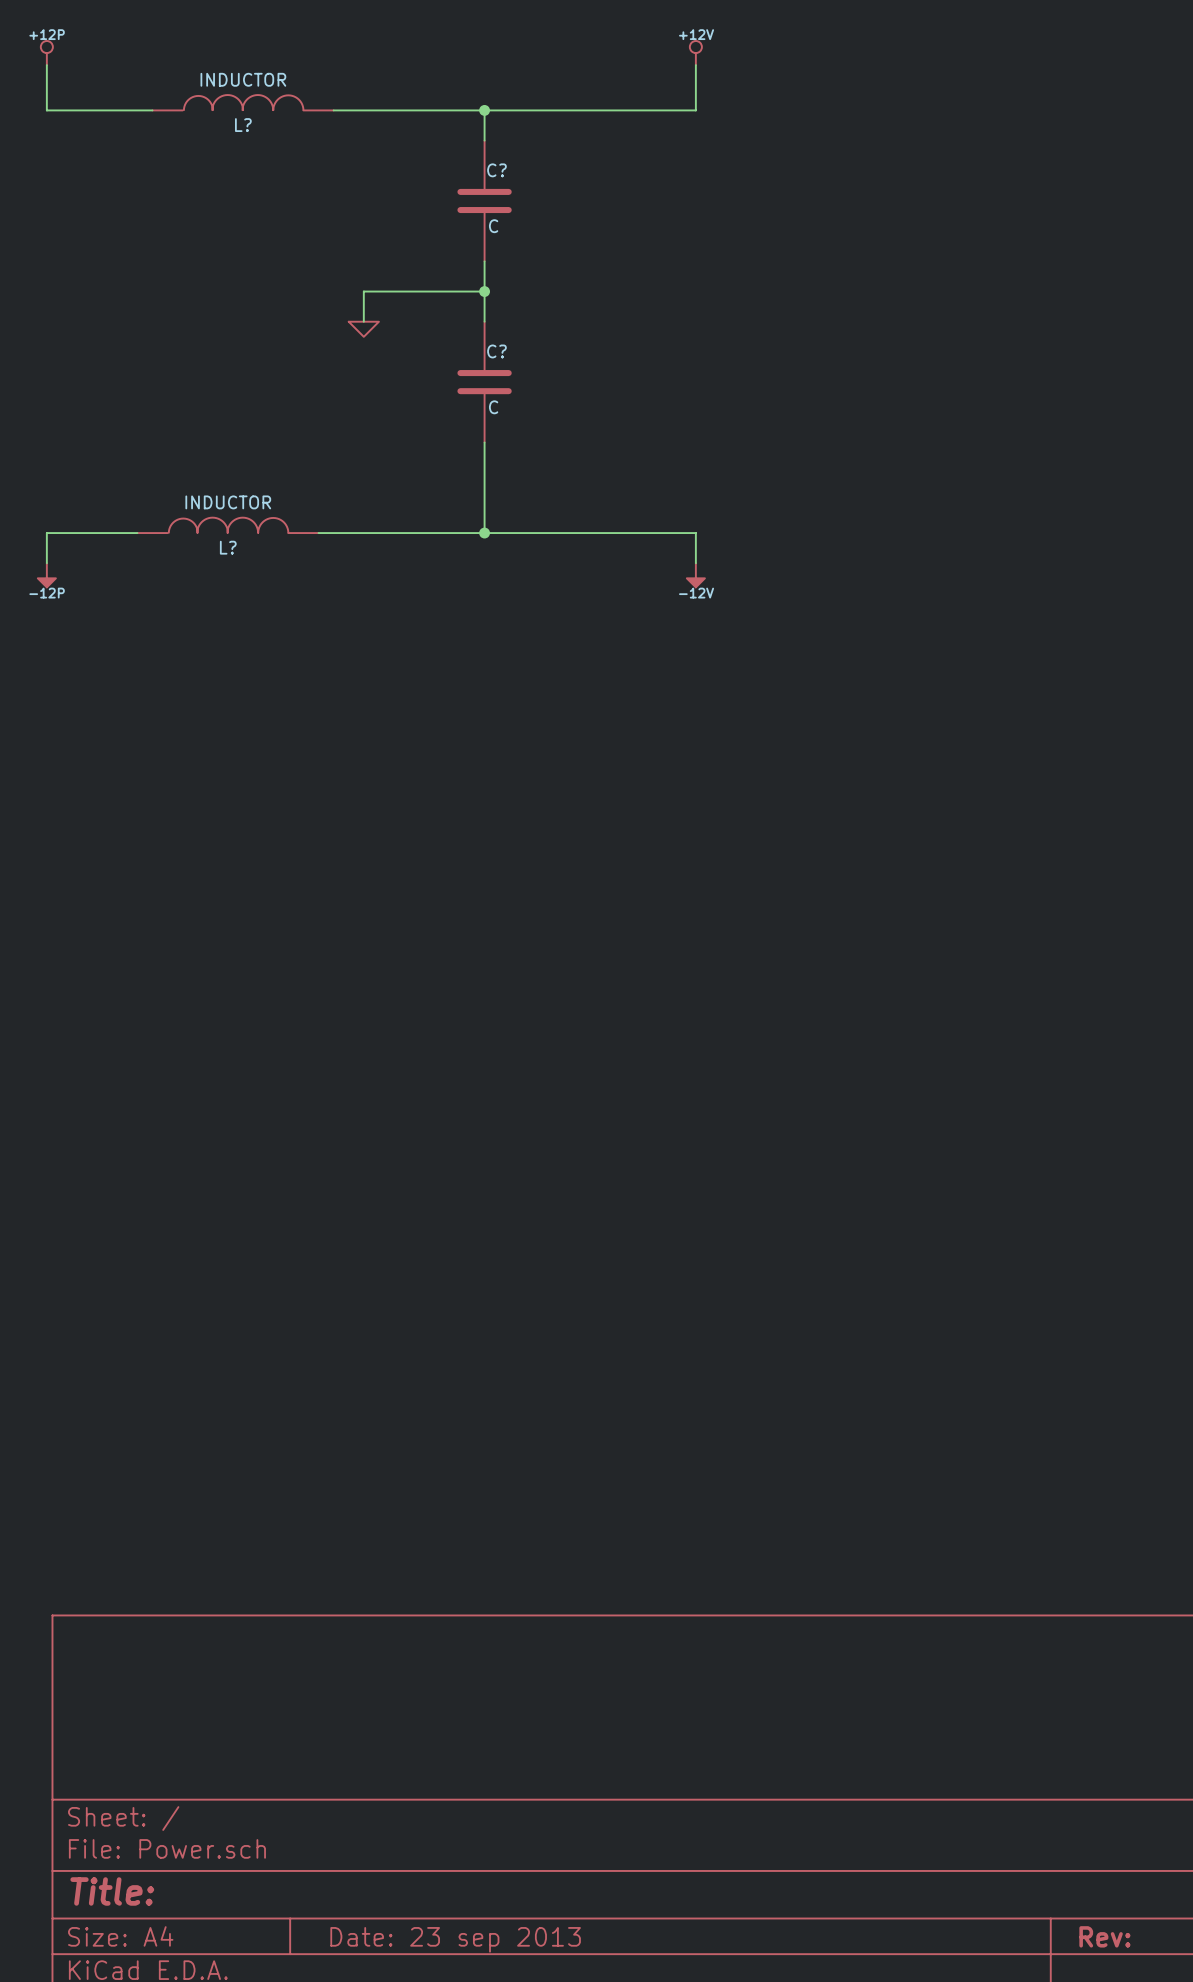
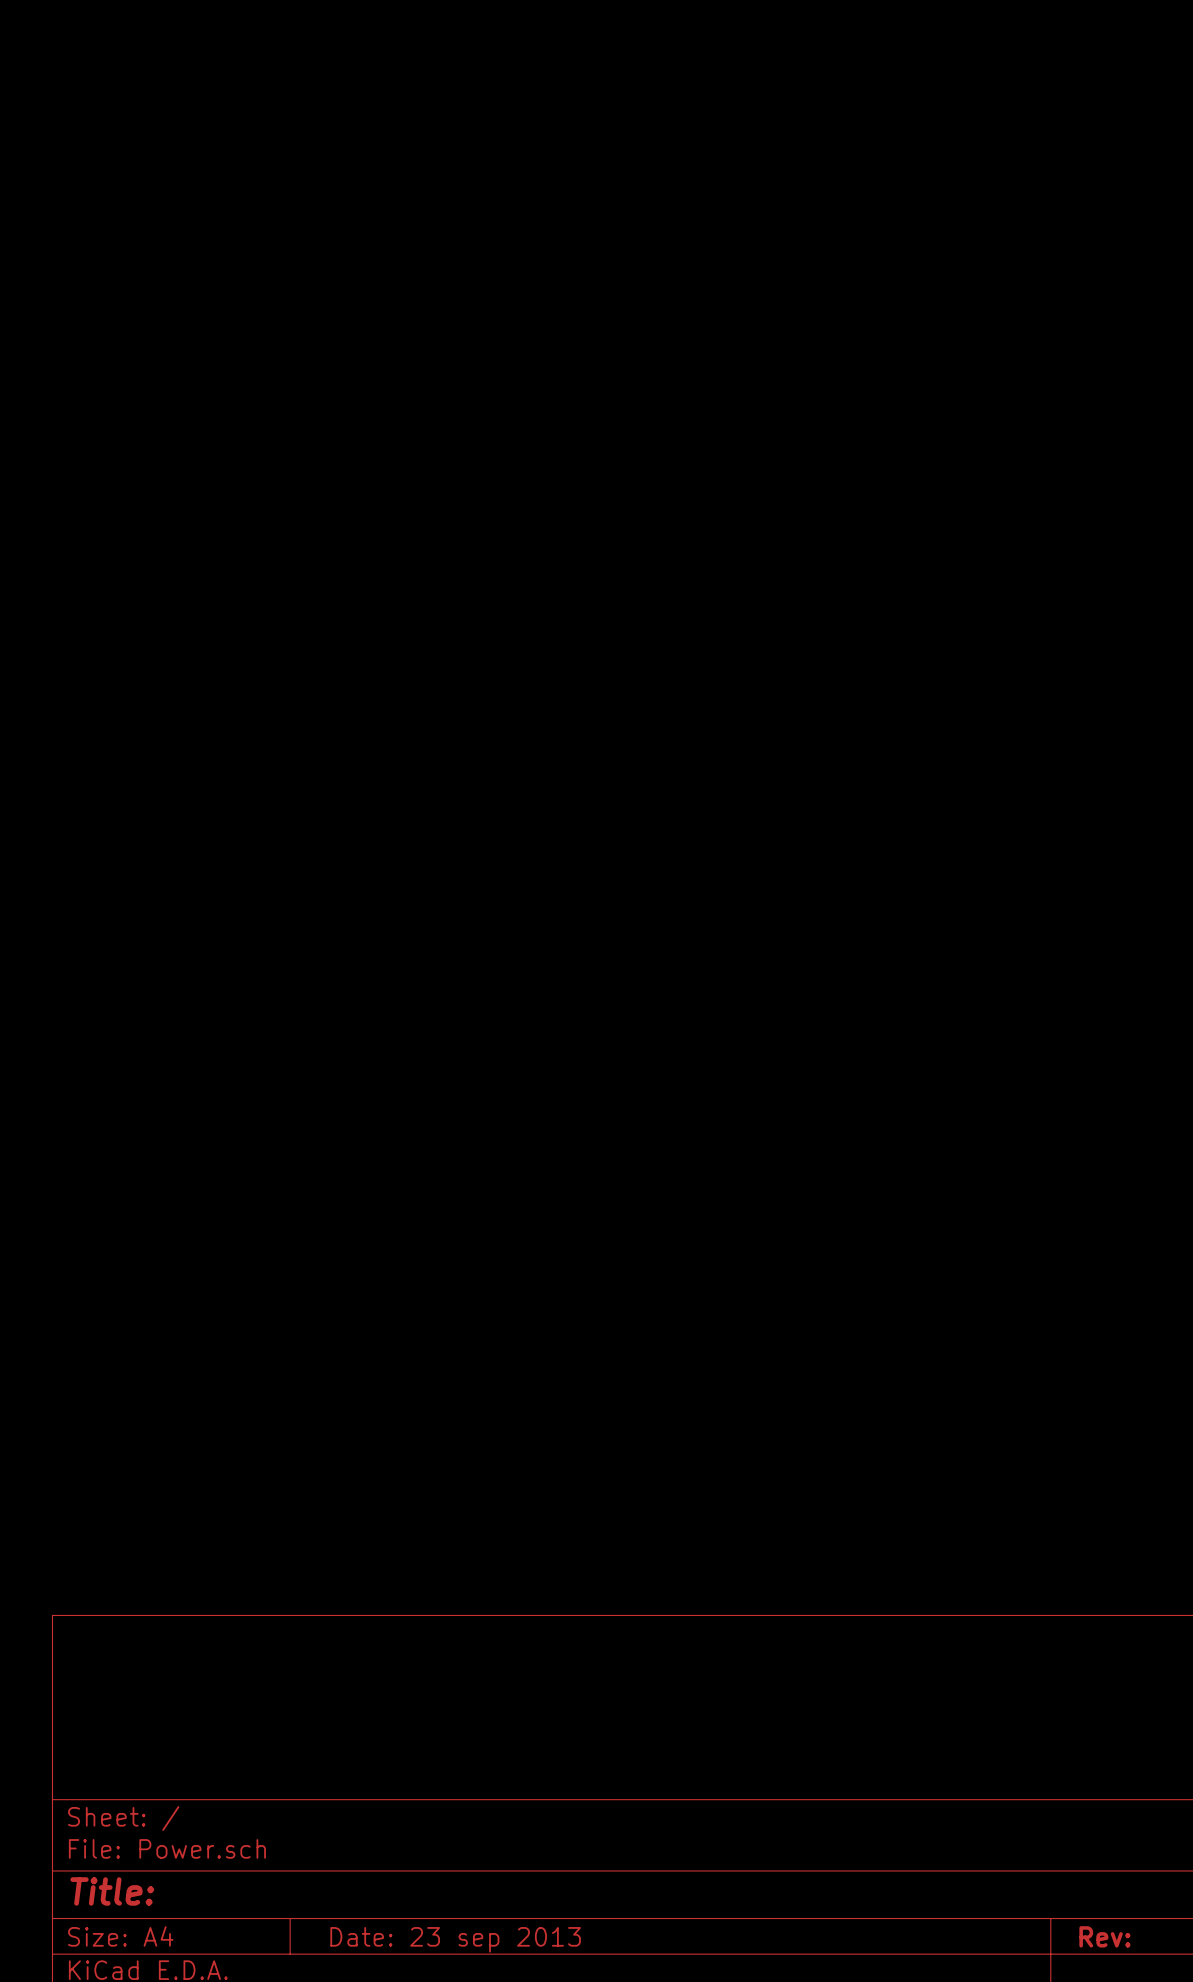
power symbol: +12P (46, 53) -> none
power symbol: +12V (695, 53) -> none
wire: (46, 65) (46, 110) (152, 110) -> none
wire: (695, 65) (695, 110) (333, 110) -> none
L?: INDUCTOR (243, 102) -> none
wire: (484, 110) (484, 140) -> none
junction: (484, 110) -> none
C?: C (484, 200) -> none
wire: (484, 261) (484, 321) -> none
wire: (484, 291) (363, 291) (363, 321) -> none
junction: (484, 291) -> none
power symbol: (363, 329) -> none
C?: C (484, 382) -> none
wire: (484, 442) (484, 533) -> none
L?: INDUCTOR (227, 525) -> none
wire: (137, 533) (46, 533) (46, 563) -> none
wire: (318, 533) (695, 533) (695, 563) -> none
junction: (484, 533) -> none
power symbol: -12P (46, 575) -> none
power symbol: -12V (695, 575) -> none

